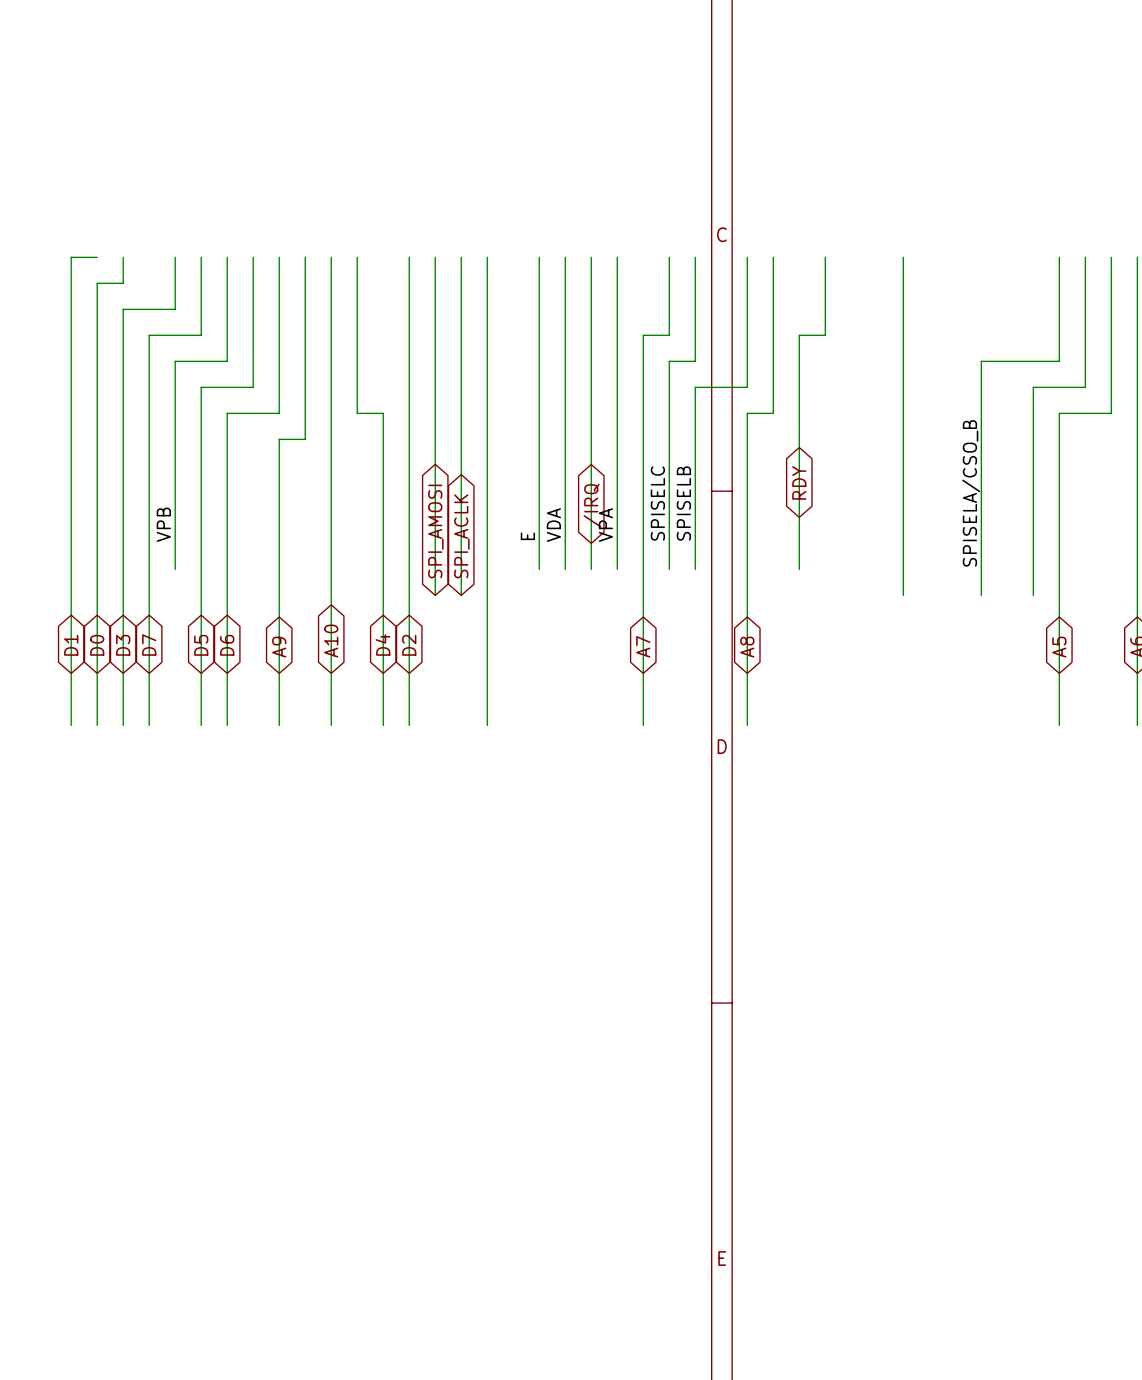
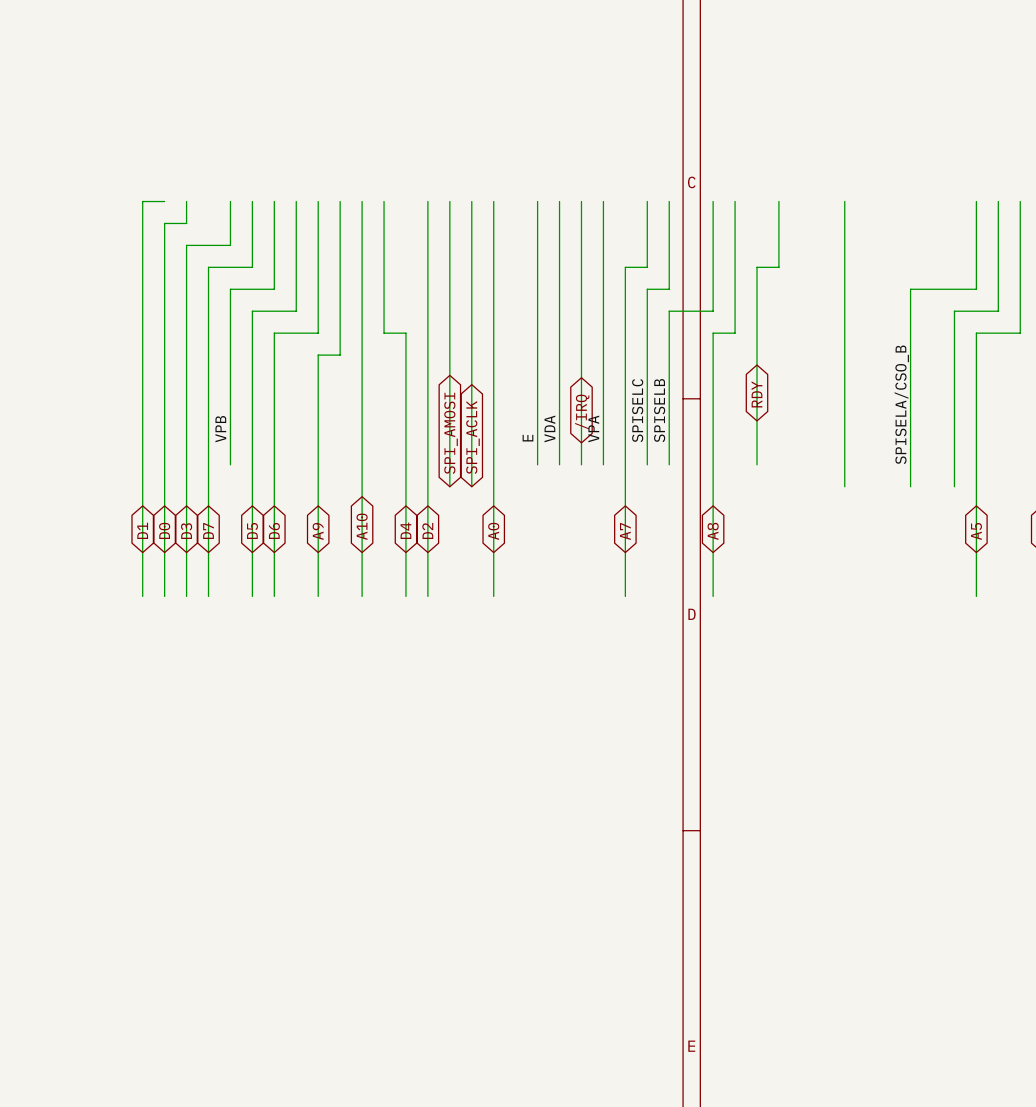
global label: none -> A0 (493, 531)

